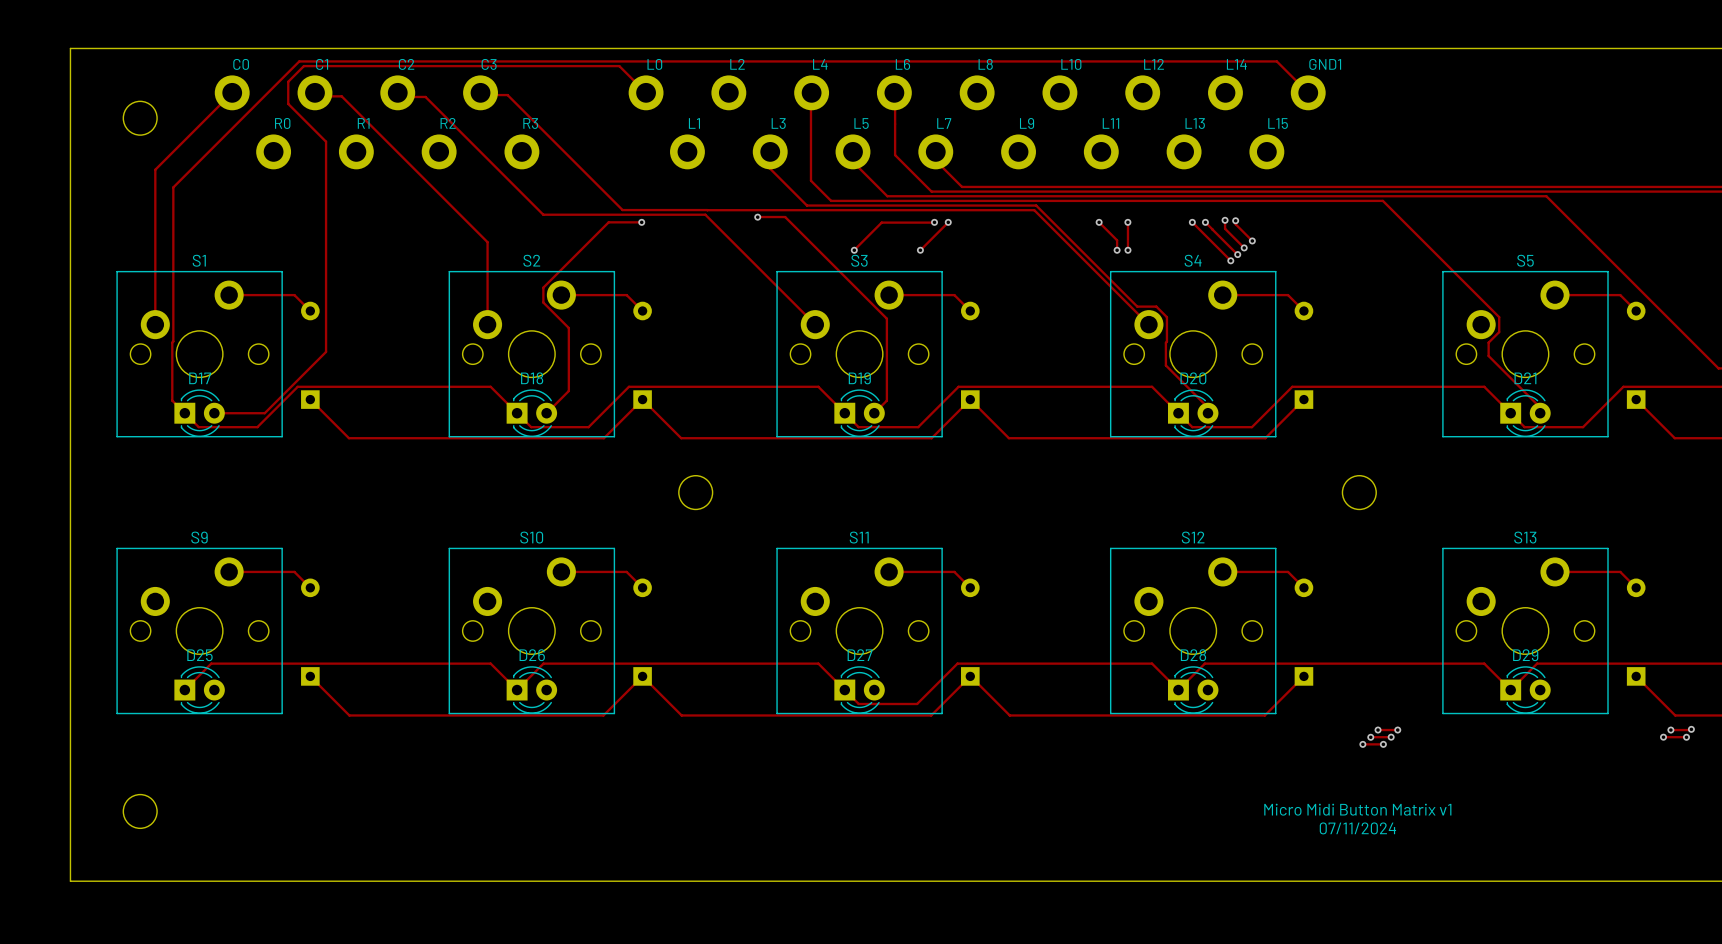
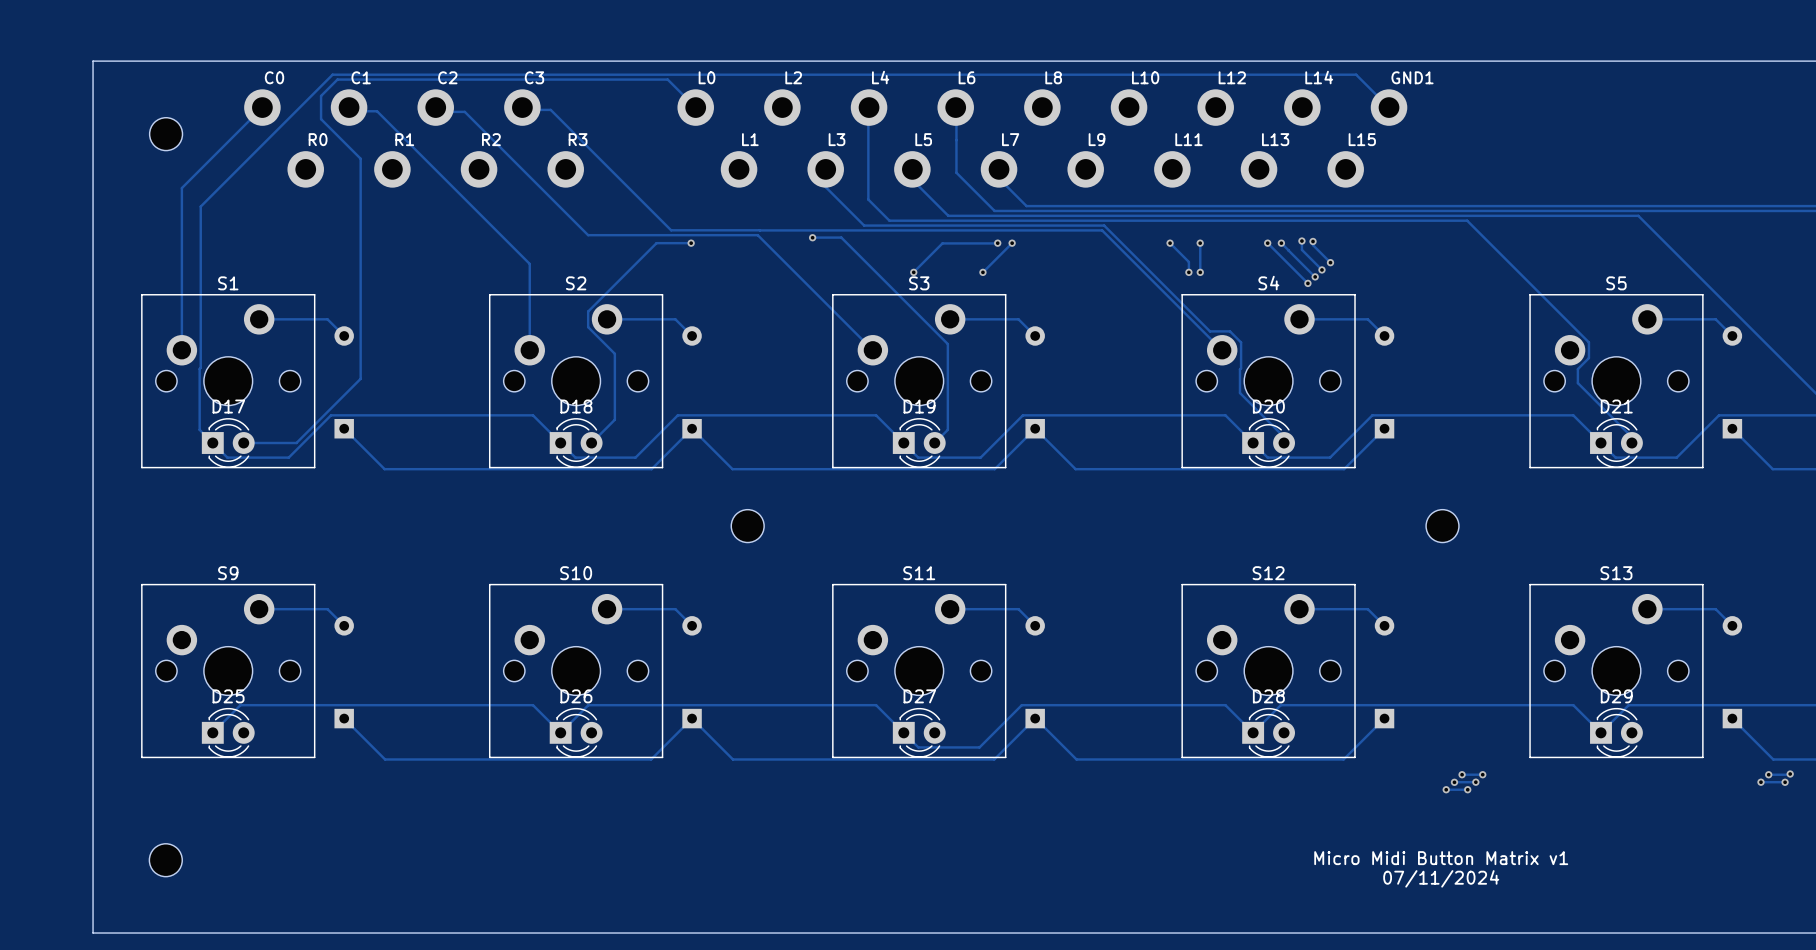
round board edge: [123, 101, 158, 136] -> none
part: none -> (166, 134)
round board edge: [678, 475, 713, 510] -> none
round board edge: [1342, 475, 1377, 510] -> none
part: none -> (747, 526)
part: none -> (1442, 526)
round board edge: [123, 794, 158, 829] -> none
part: none -> (165, 860)

